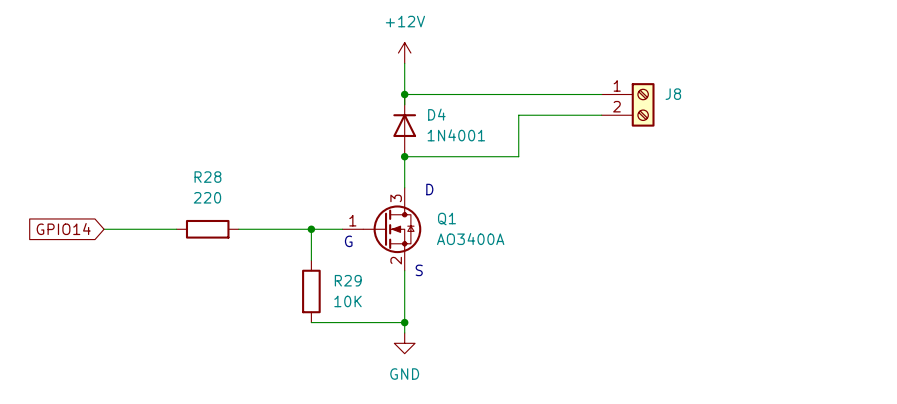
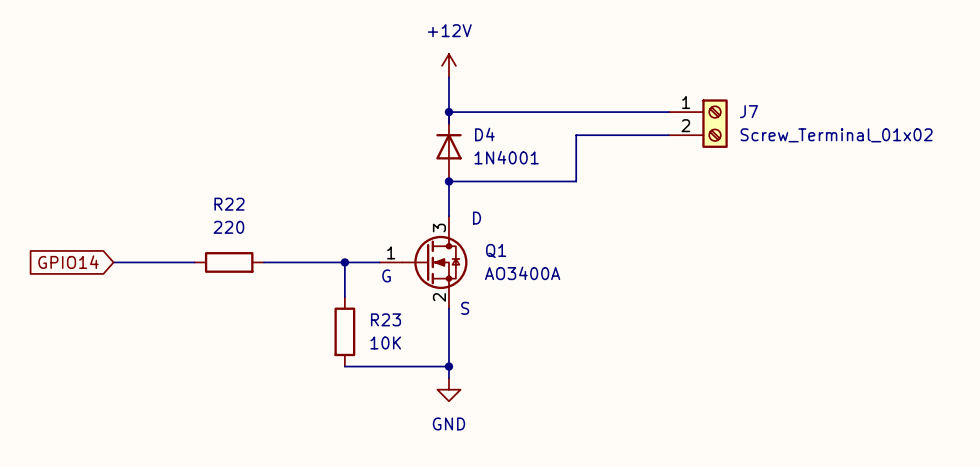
J8 name: J8 (673, 94) -> J7 (748, 111)
J8 value: none -> Screw_Terminal_01x02 (836, 135)
R28 name: R28 (207, 177) -> R22 (229, 204)
R29 name: R29 (348, 280) -> R23 (386, 319)

